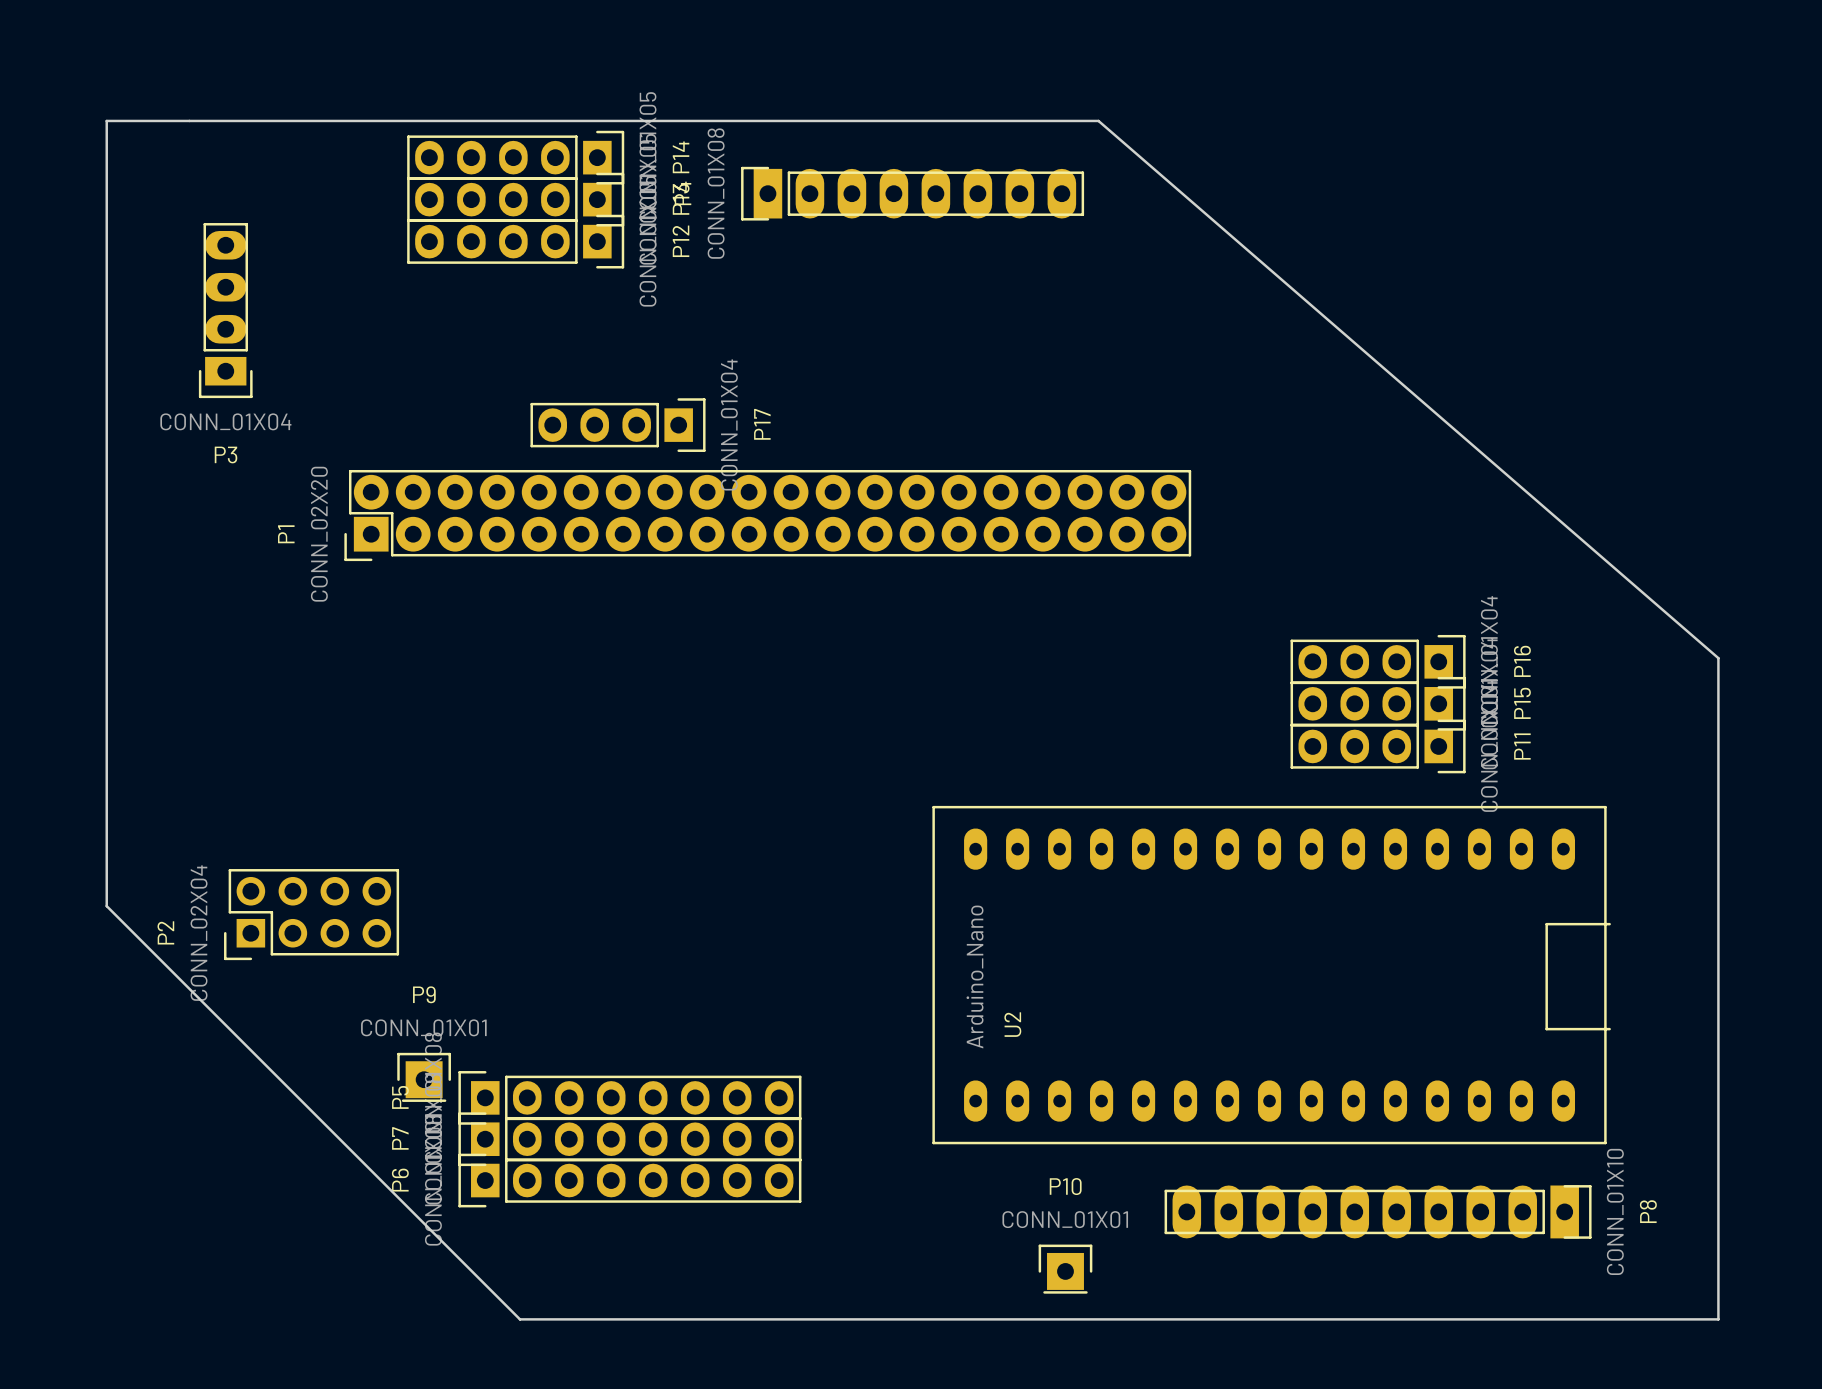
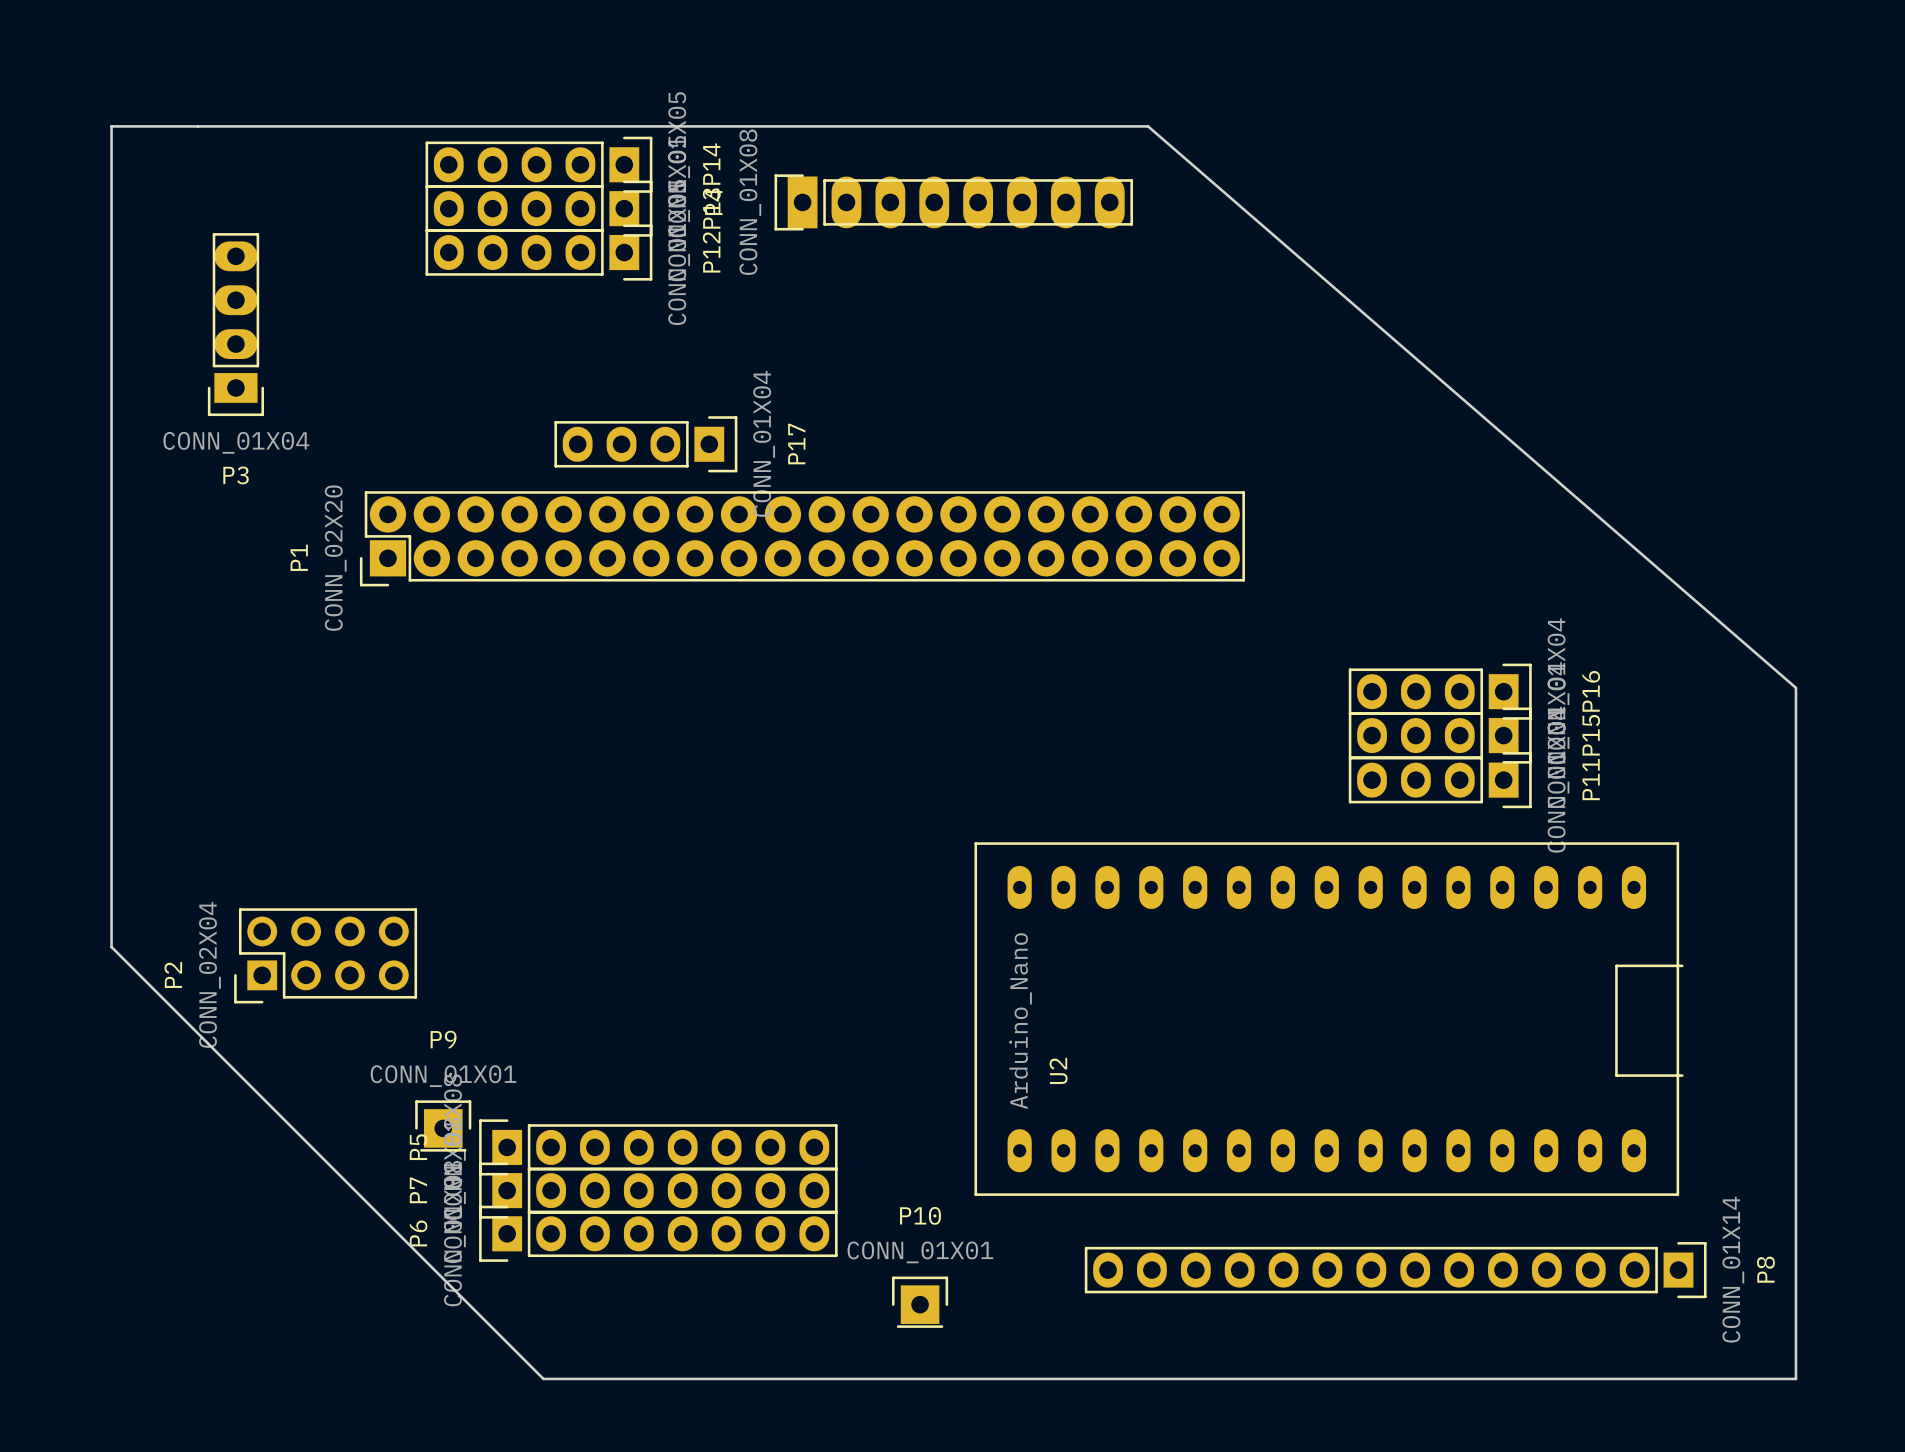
P8 footprint: [1164, 1185, 1592, 1239] -> [1084, 1242, 1707, 1299]
P8 value: CONN_01X10 (1615, 1211) -> CONN_01X14 (1733, 1269)
P8 name position: P8 (1648, 1211) -> P8 (1765, 1269)
P10 position: (1065, 1269) -> (920, 1302)

